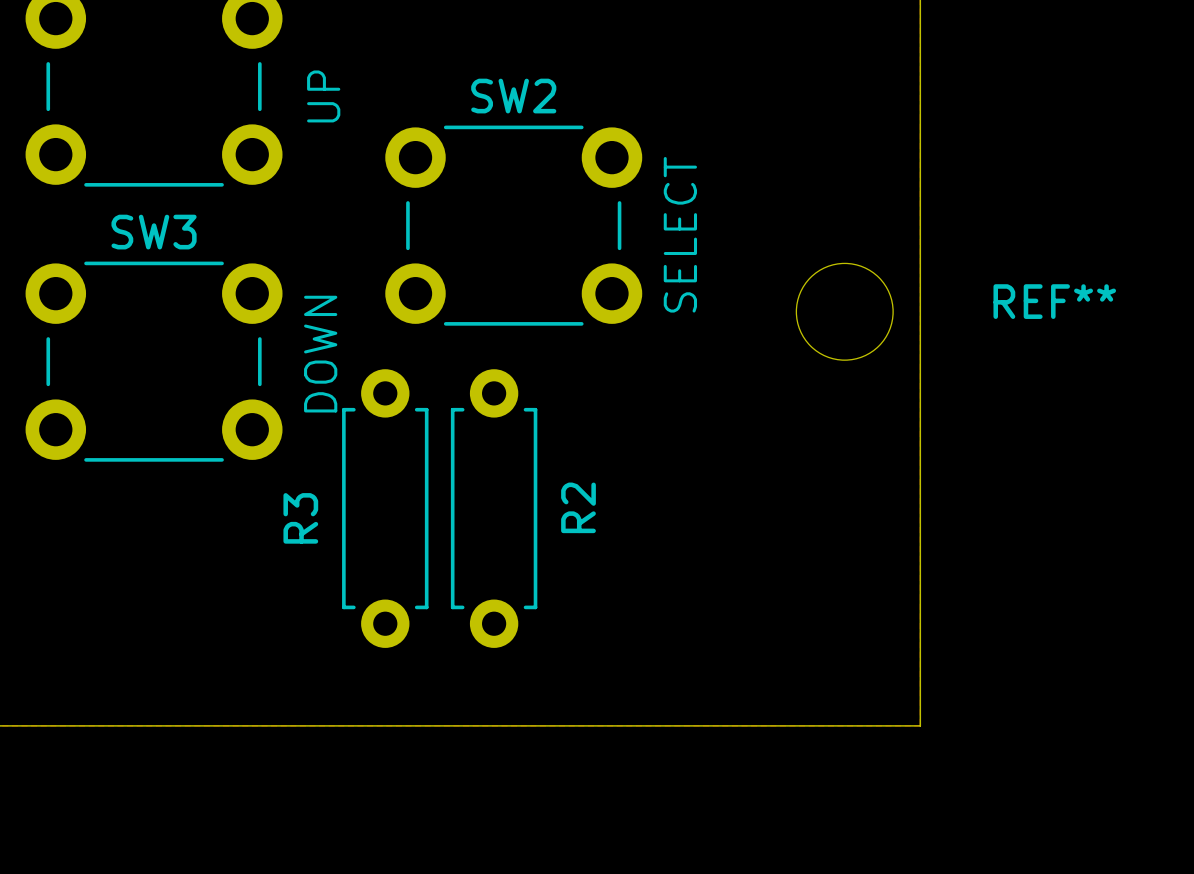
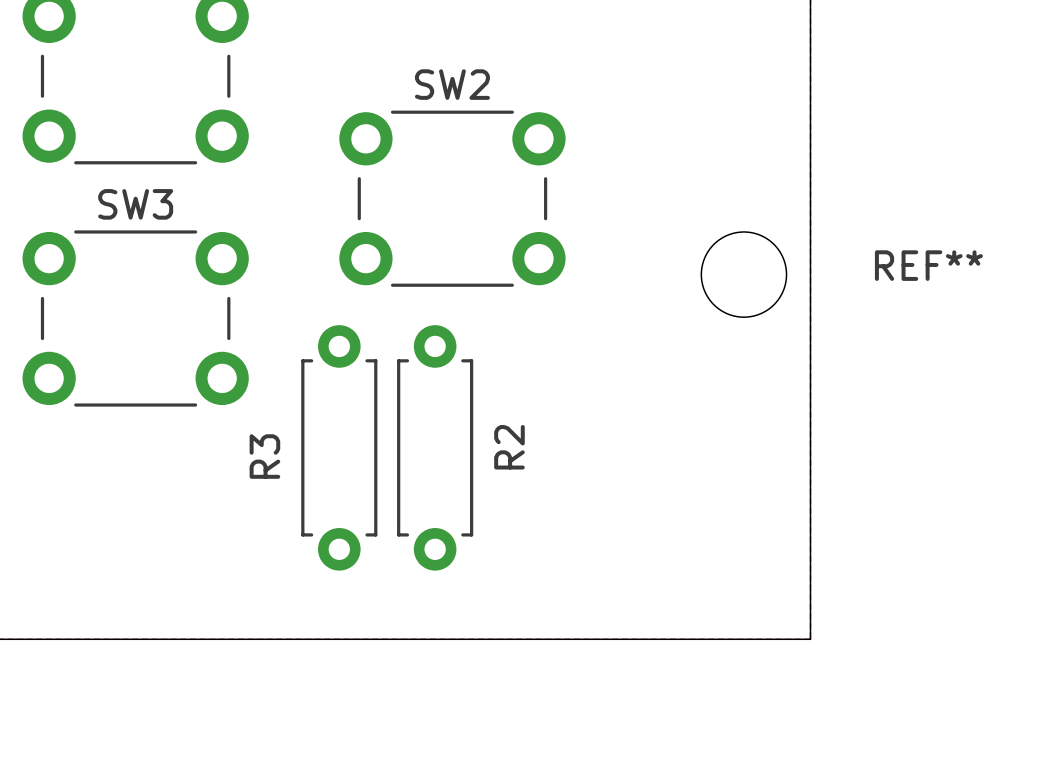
text: UP (323, 96) -> none
text: SELECT (680, 234) -> none
text: DOWN (320, 354) -> none

